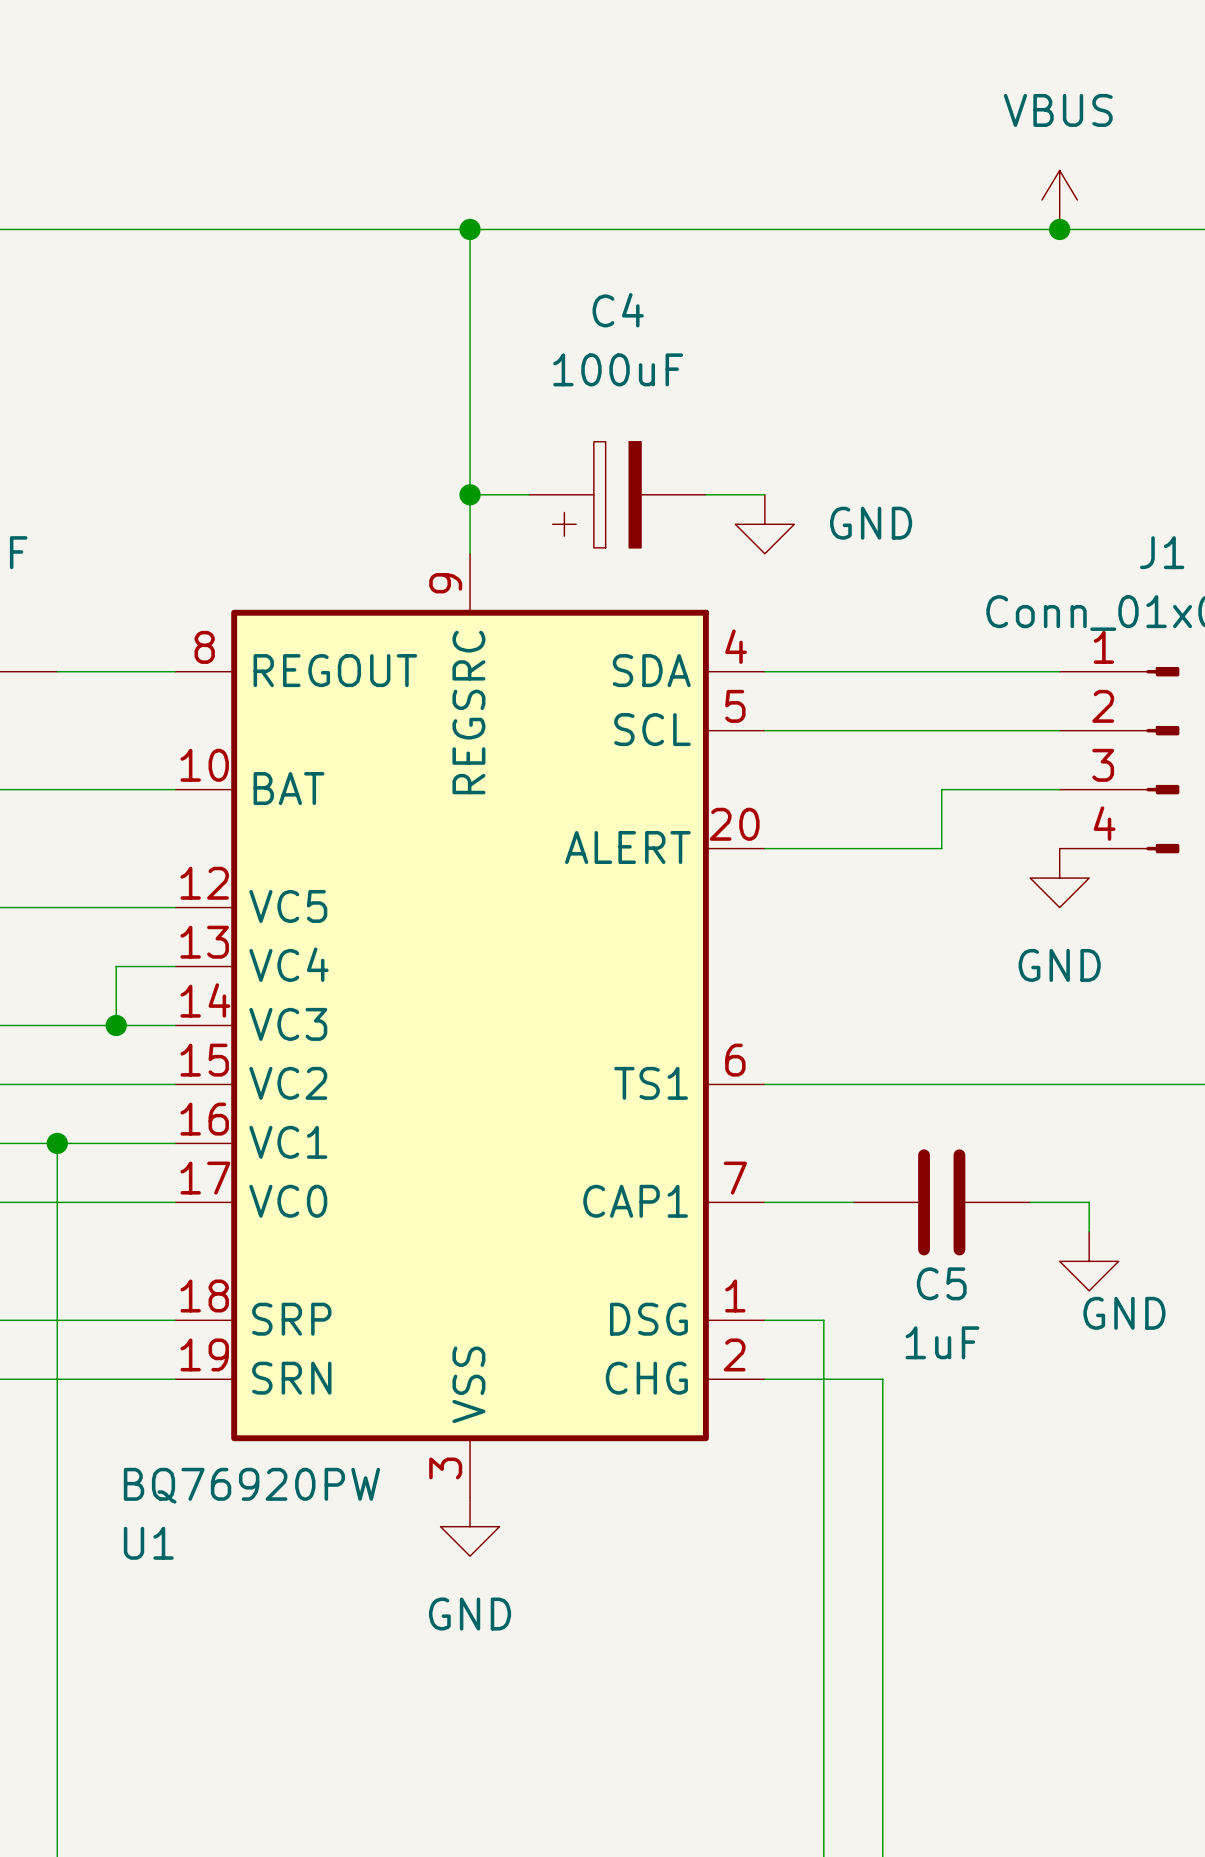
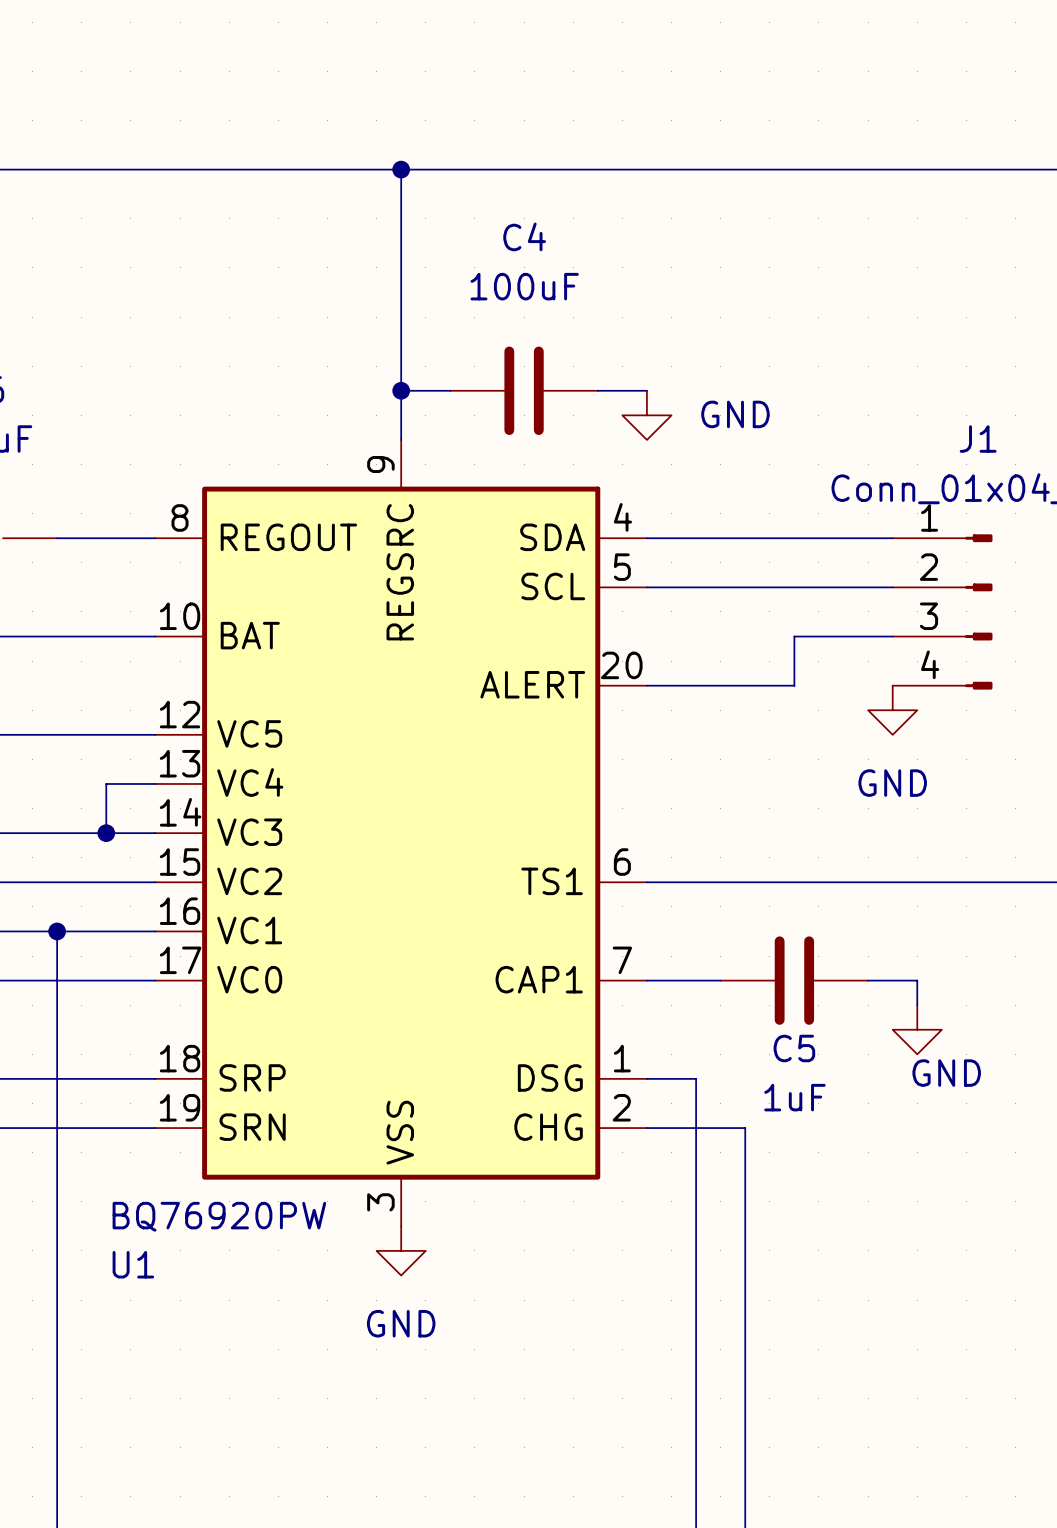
power symbol: VBUS (1059, 199) -> none
junction: (1059, 229) -> none
C4 symbol: [528, 441, 706, 548] -> [450, 346, 598, 436]

